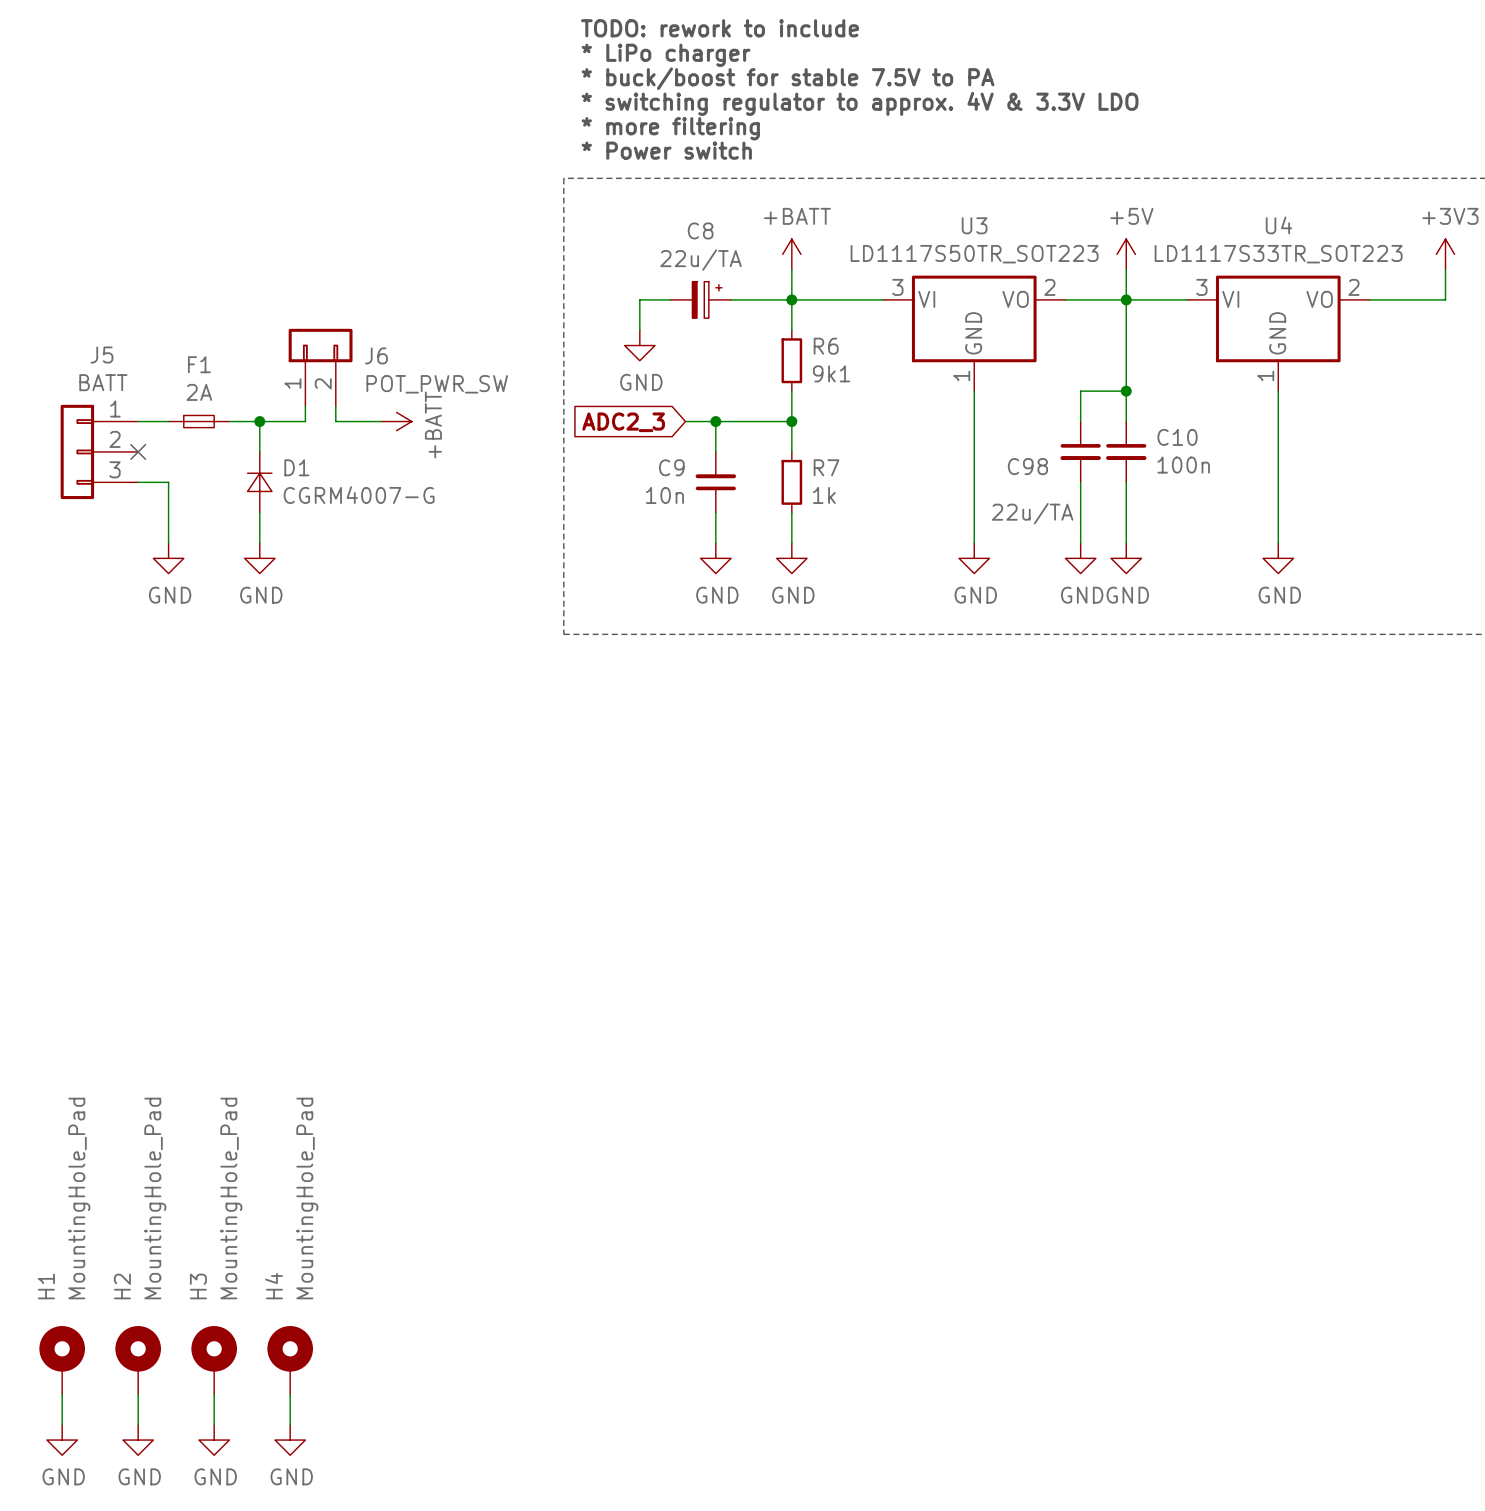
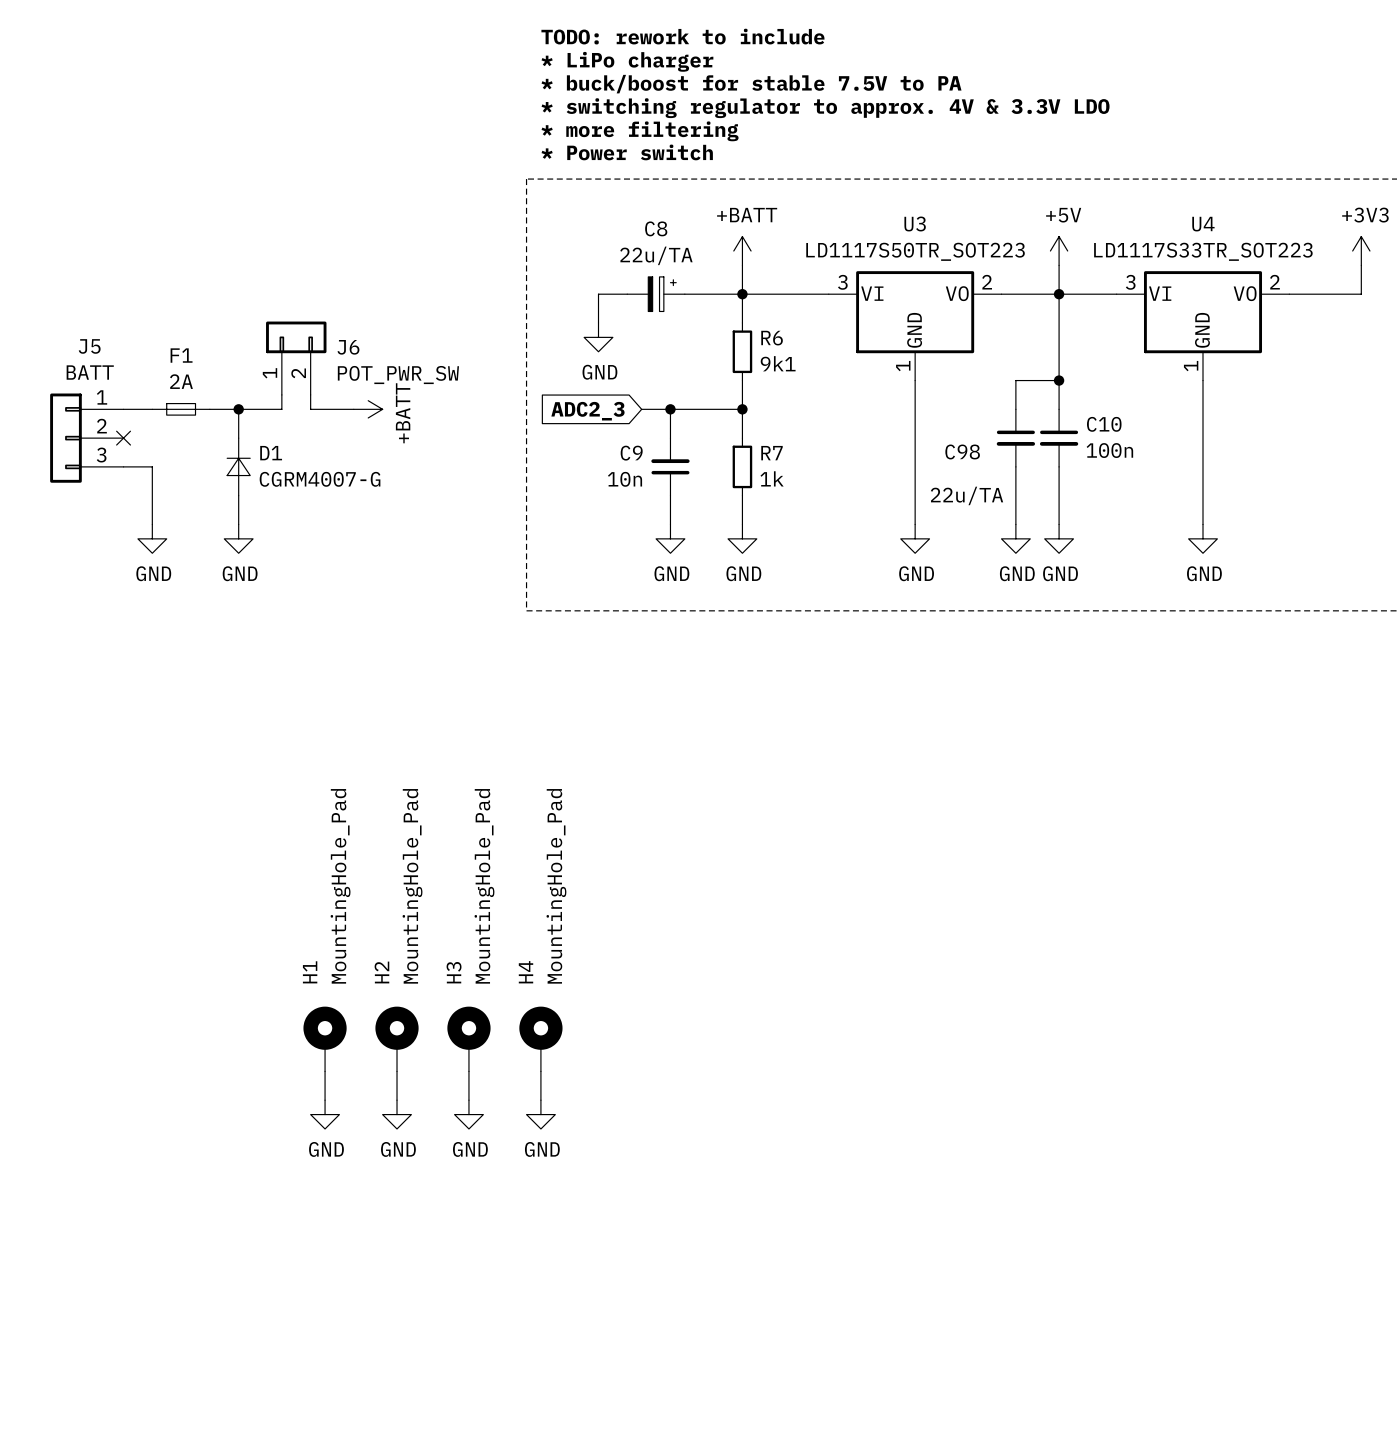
wire: none -> (397, 1071) (397, 1100)
wire: none -> (468, 1071) (468, 1100)
wire: none -> (540, 1071) (540, 1100)
power symbol: none -> GND (325, 1114)
power symbol: none -> GND (397, 1114)
power symbol: none -> GND (468, 1114)
power symbol: none -> GND (540, 1114)
H1 position: (62, 1360) -> (325, 1039)
H2 position: (138, 1360) -> (397, 1039)
H3 position: (214, 1360) -> (468, 1039)
H4 position: (290, 1360) -> (540, 1039)
wire: (62, 1394) (62, 1424) -> none
wire: (138, 1394) (138, 1424) -> none
wire: (214, 1394) (214, 1424) -> none
wire: (290, 1394) (290, 1424) -> (325, 1071) (325, 1100)
power symbol: GND (62, 1440) -> none
power symbol: GND (138, 1440) -> none
power symbol: GND (214, 1440) -> none
power symbol: GND (290, 1440) -> none

